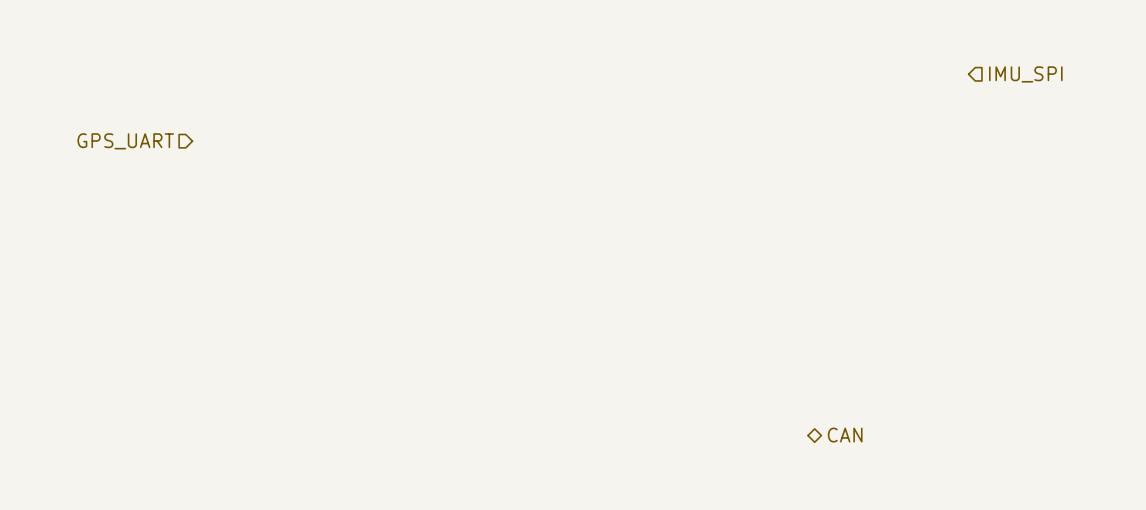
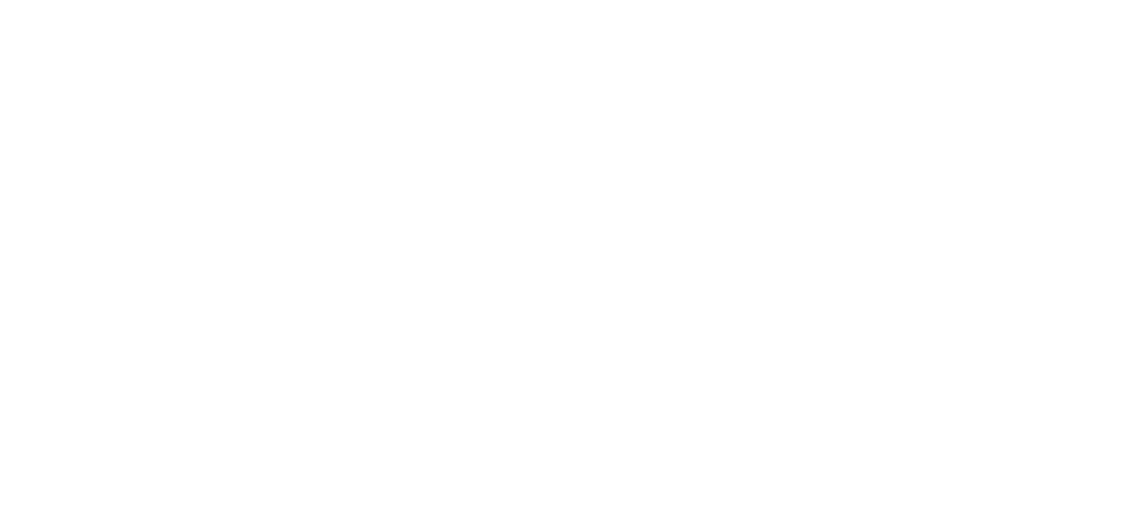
hierarchical label: IMU_SPI (1025, 74) -> none
hierarchical label: GPS_UART (125, 141) -> none
hierarchical label: CAN (845, 435) -> none

